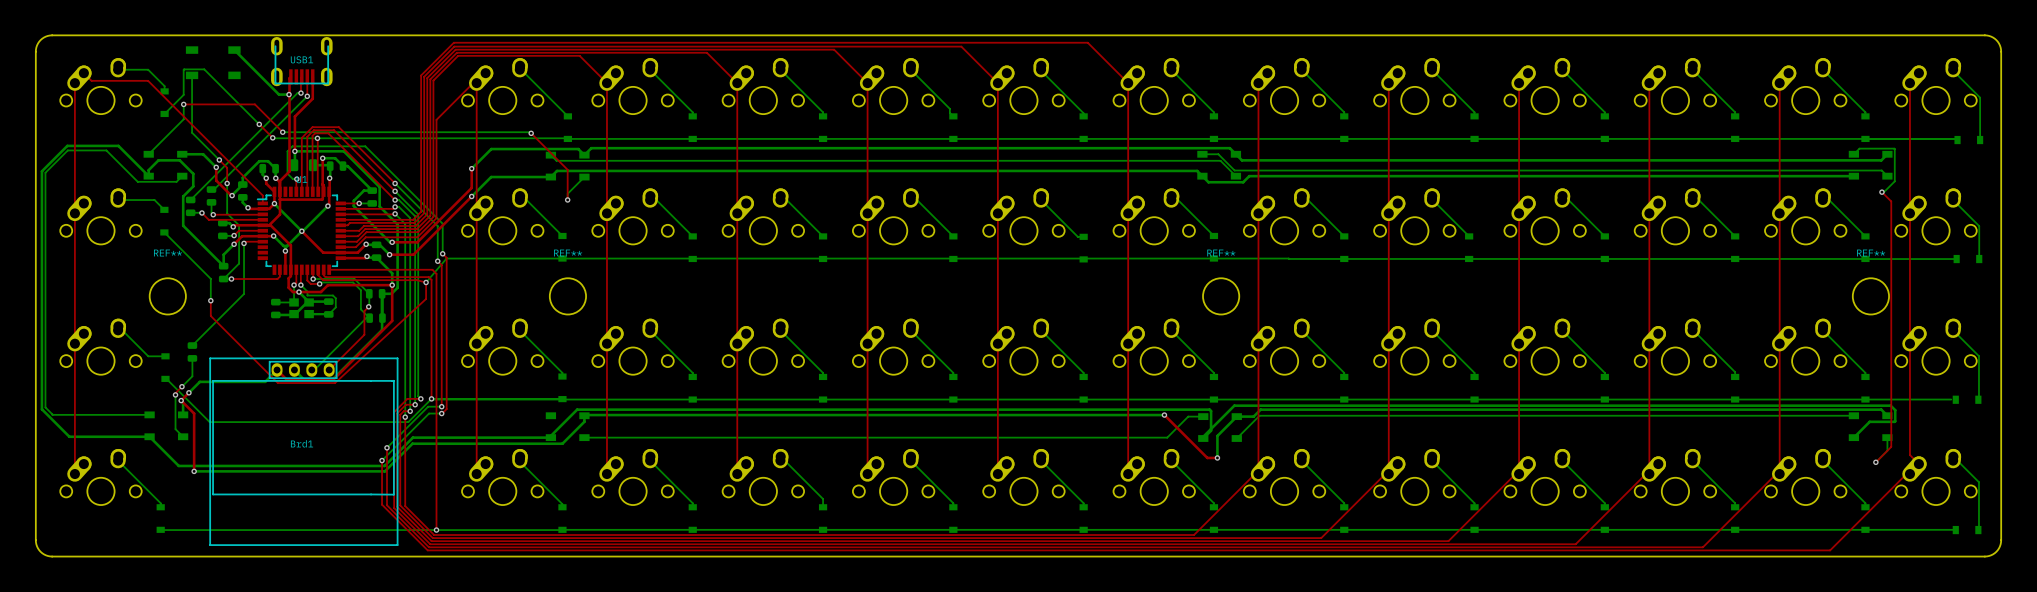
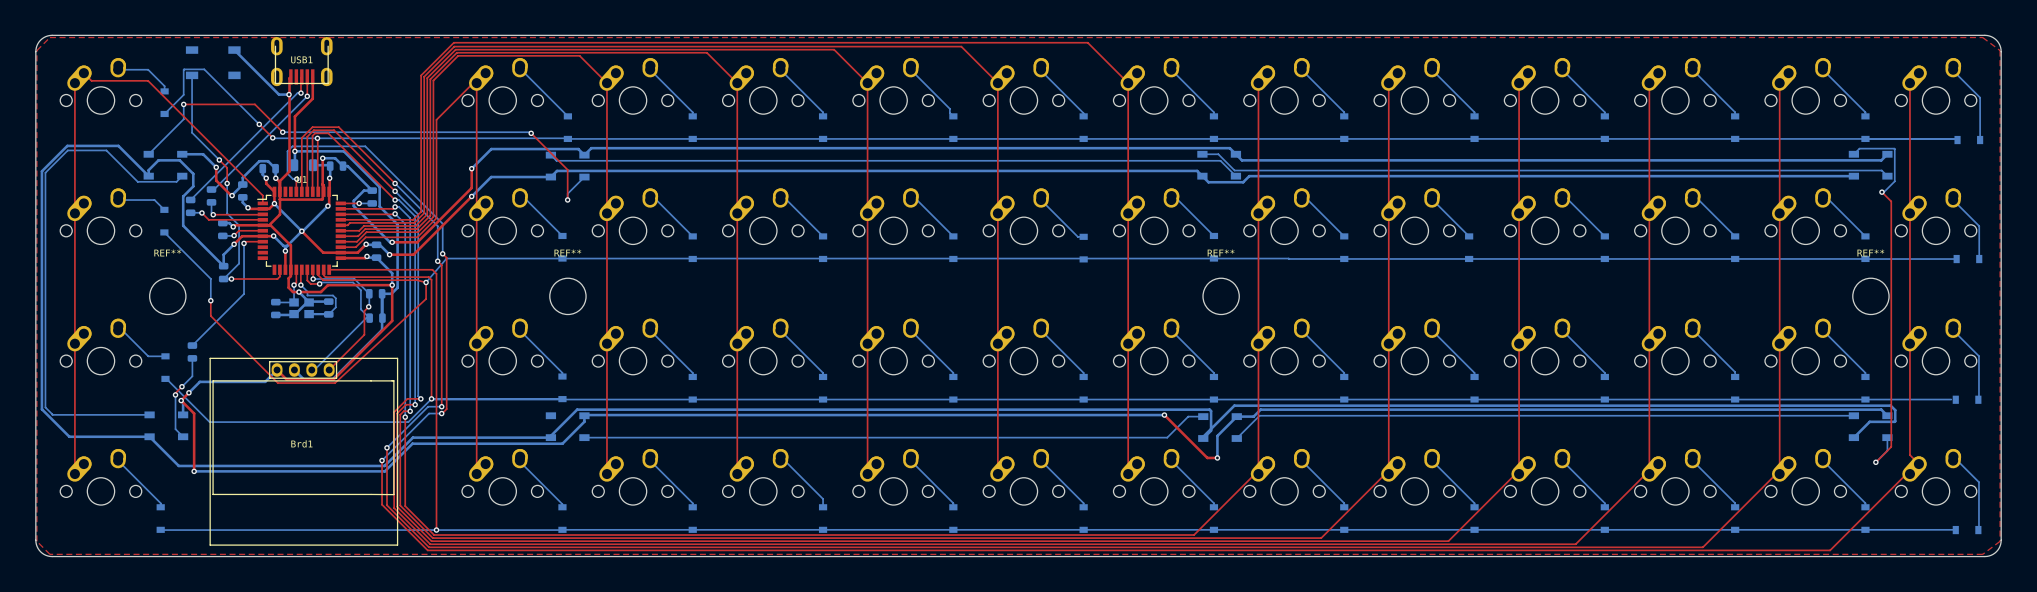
top zone outline: none -> (49, 37) (36, 50) (36, 541) (49, 554) (1982, 554) (2000, 541) (2000, 50) (1982, 37) (49, 37)

